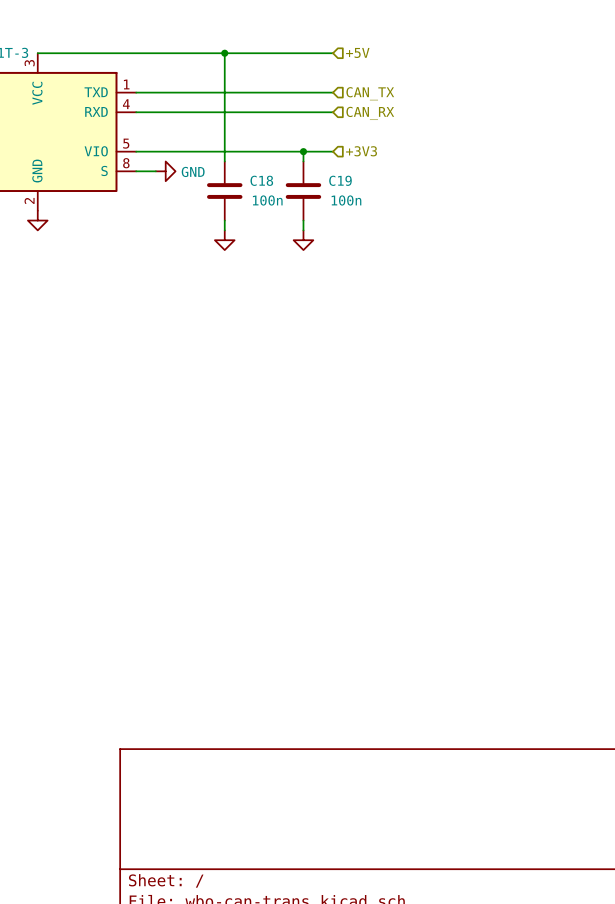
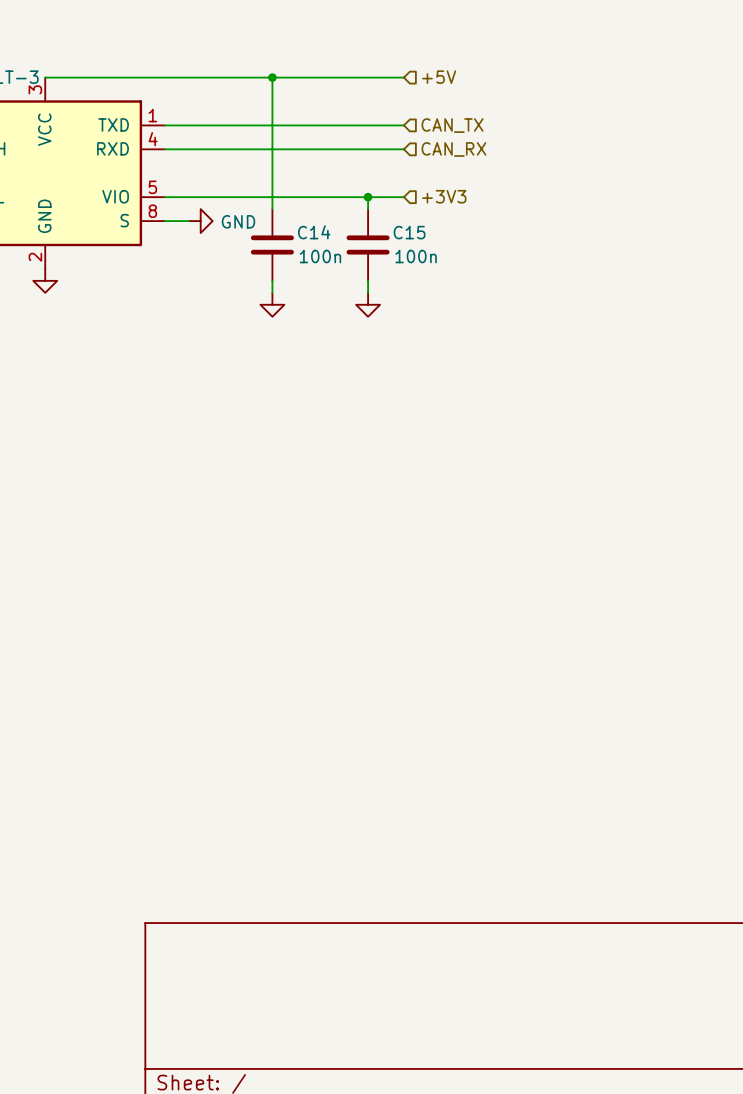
C18 name: C18 (261, 180) -> C14 (314, 232)
C19 name: C19 (340, 180) -> C15 (409, 232)

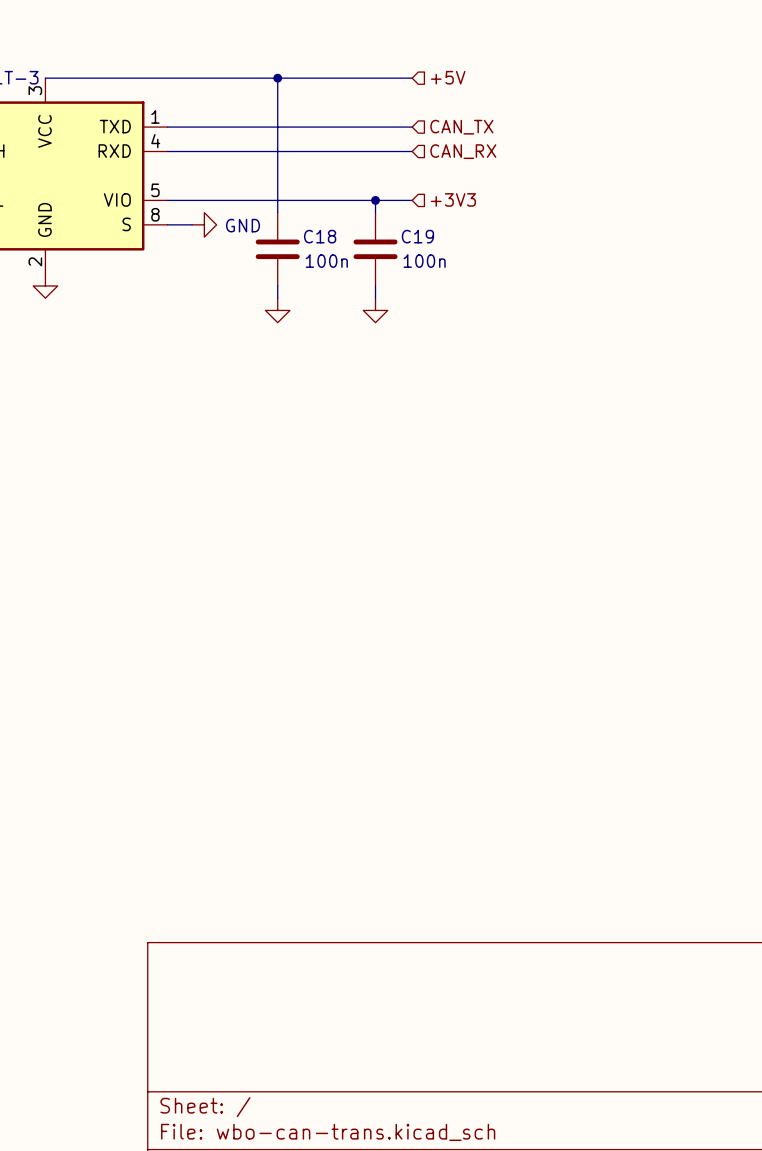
C14 name: C14 (314, 232) -> C18 (320, 236)
C15 name: C15 (409, 232) -> C19 (417, 236)

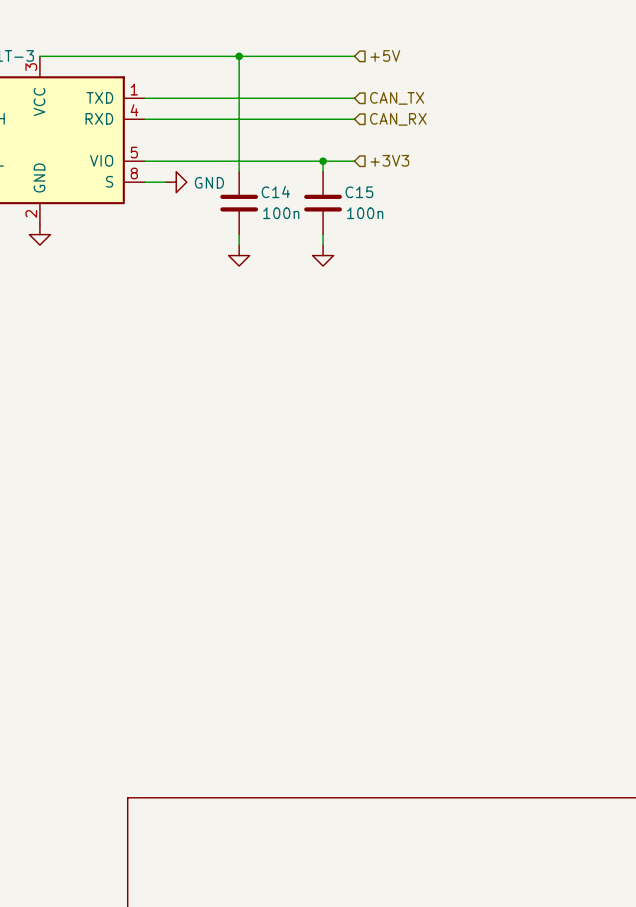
C18 name: C18 (320, 236) -> C14 (275, 192)
C19 name: C19 (417, 236) -> C15 (359, 192)

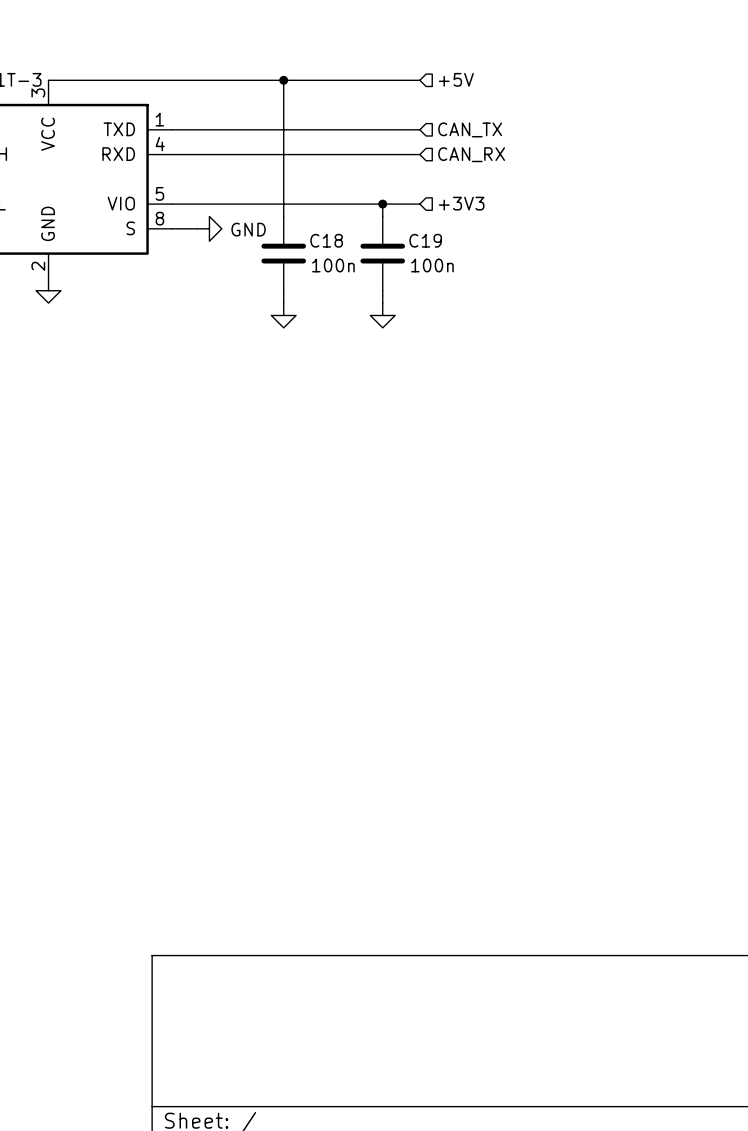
C14 name: C14 (275, 192) -> C18 (326, 240)
C15 name: C15 (359, 192) -> C19 (425, 240)

